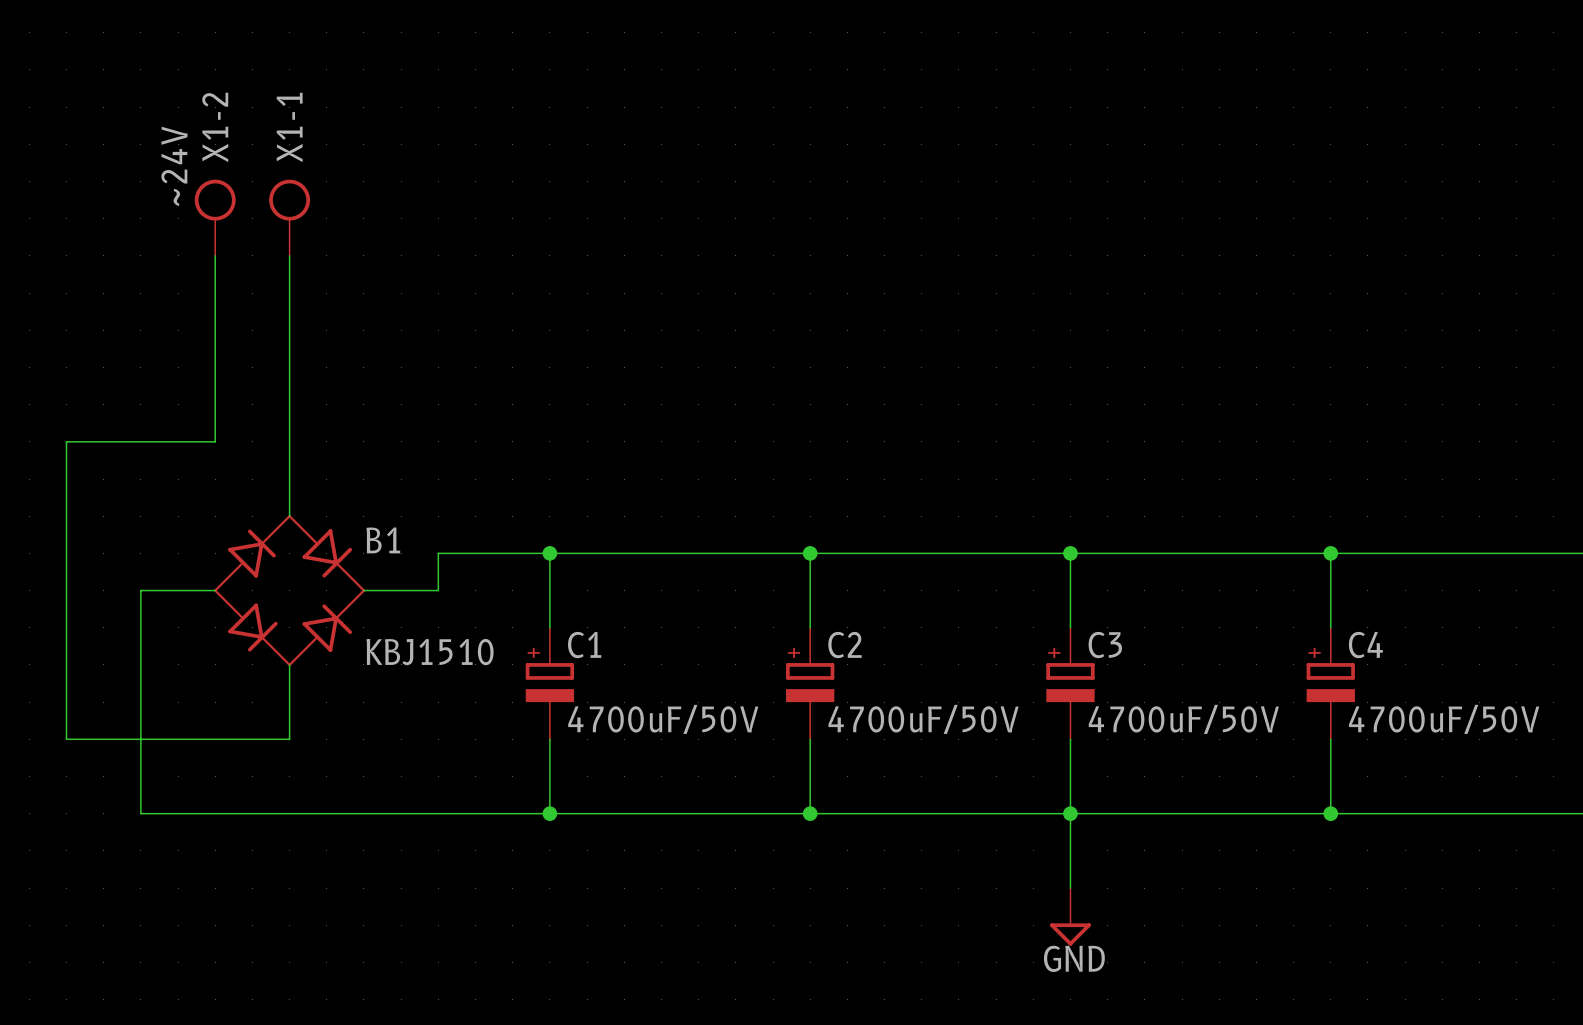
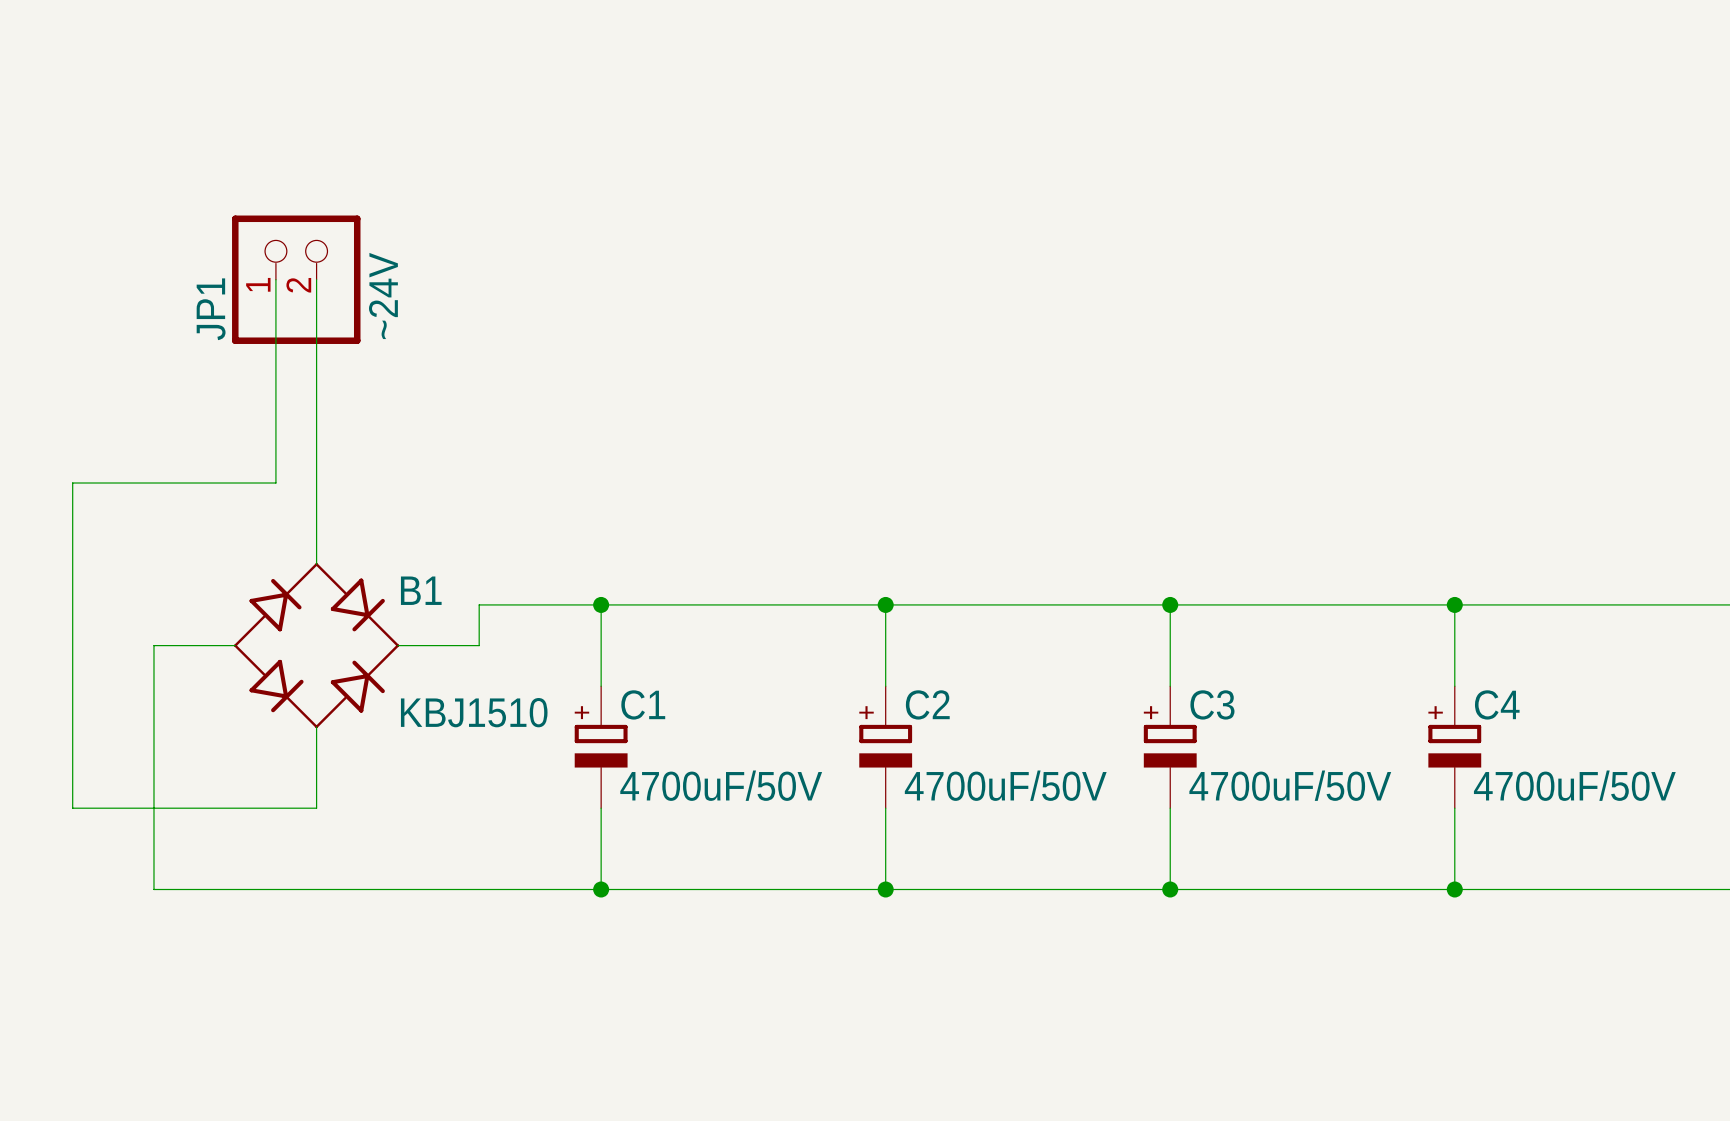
X1-2: ~24V (215, 217) -> none
X1-1: (289, 217) -> none
wire: (215, 255) (215, 441) -> (275, 279) (275, 483) (235, 483)
JP1: none -> ~24V (296, 279)
wire: (1070, 813) (1070, 888) -> none
power symbol: GND (1070, 916) -> none

